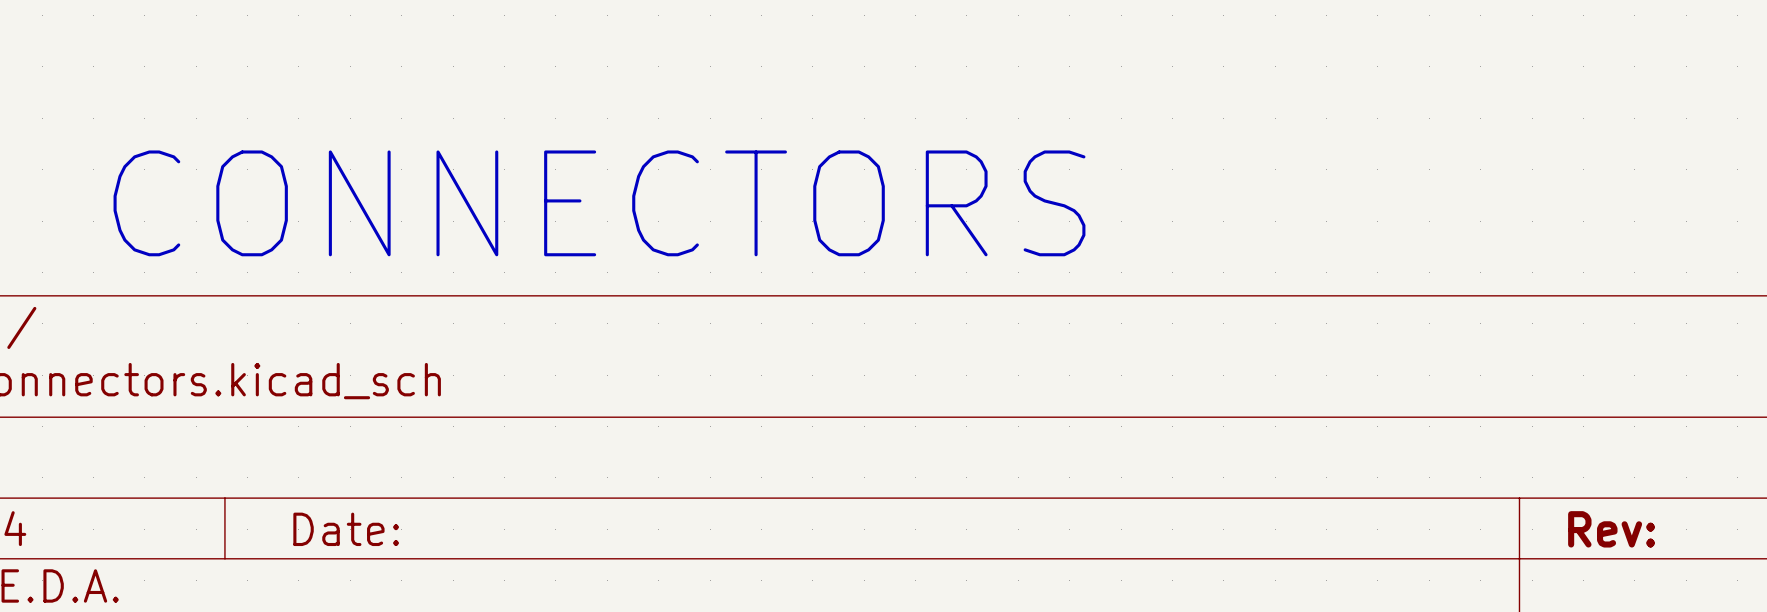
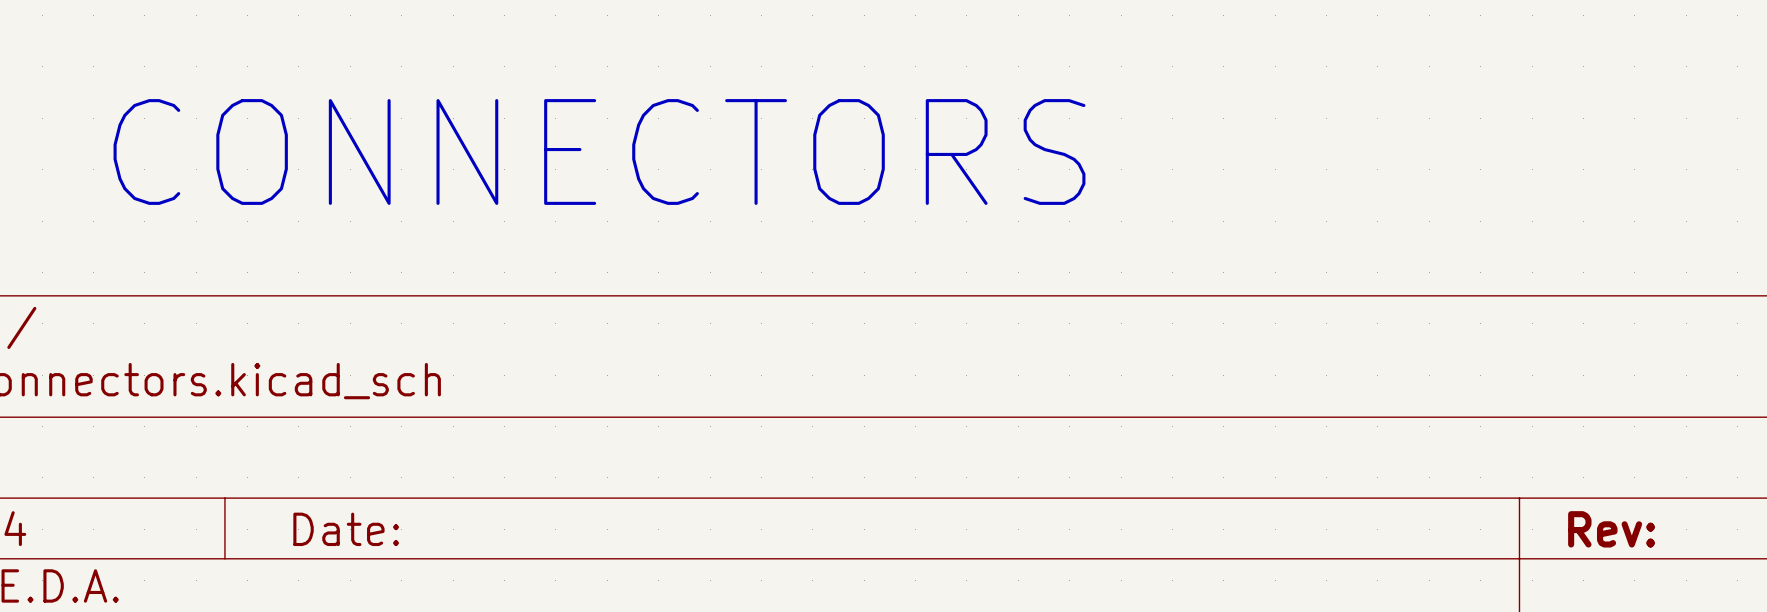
text position: CONNECTORS (599, 203) -> CONNECTORS (599, 151)

